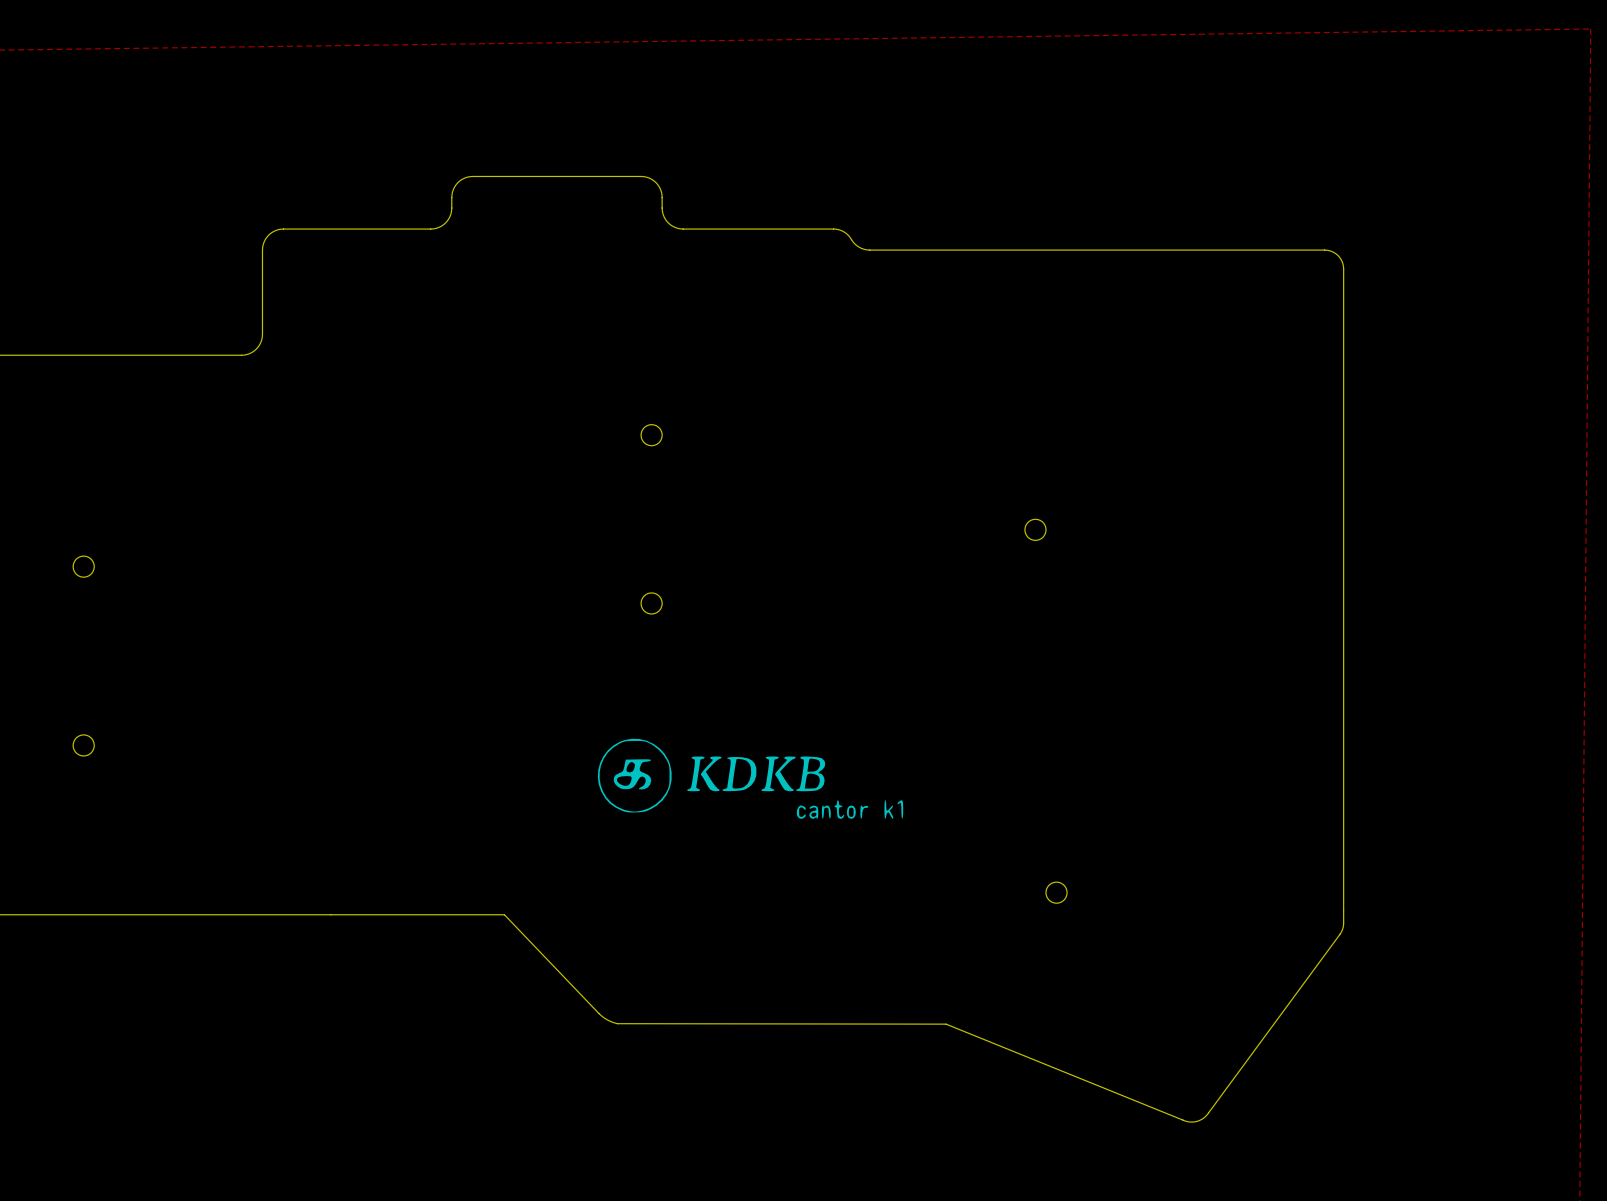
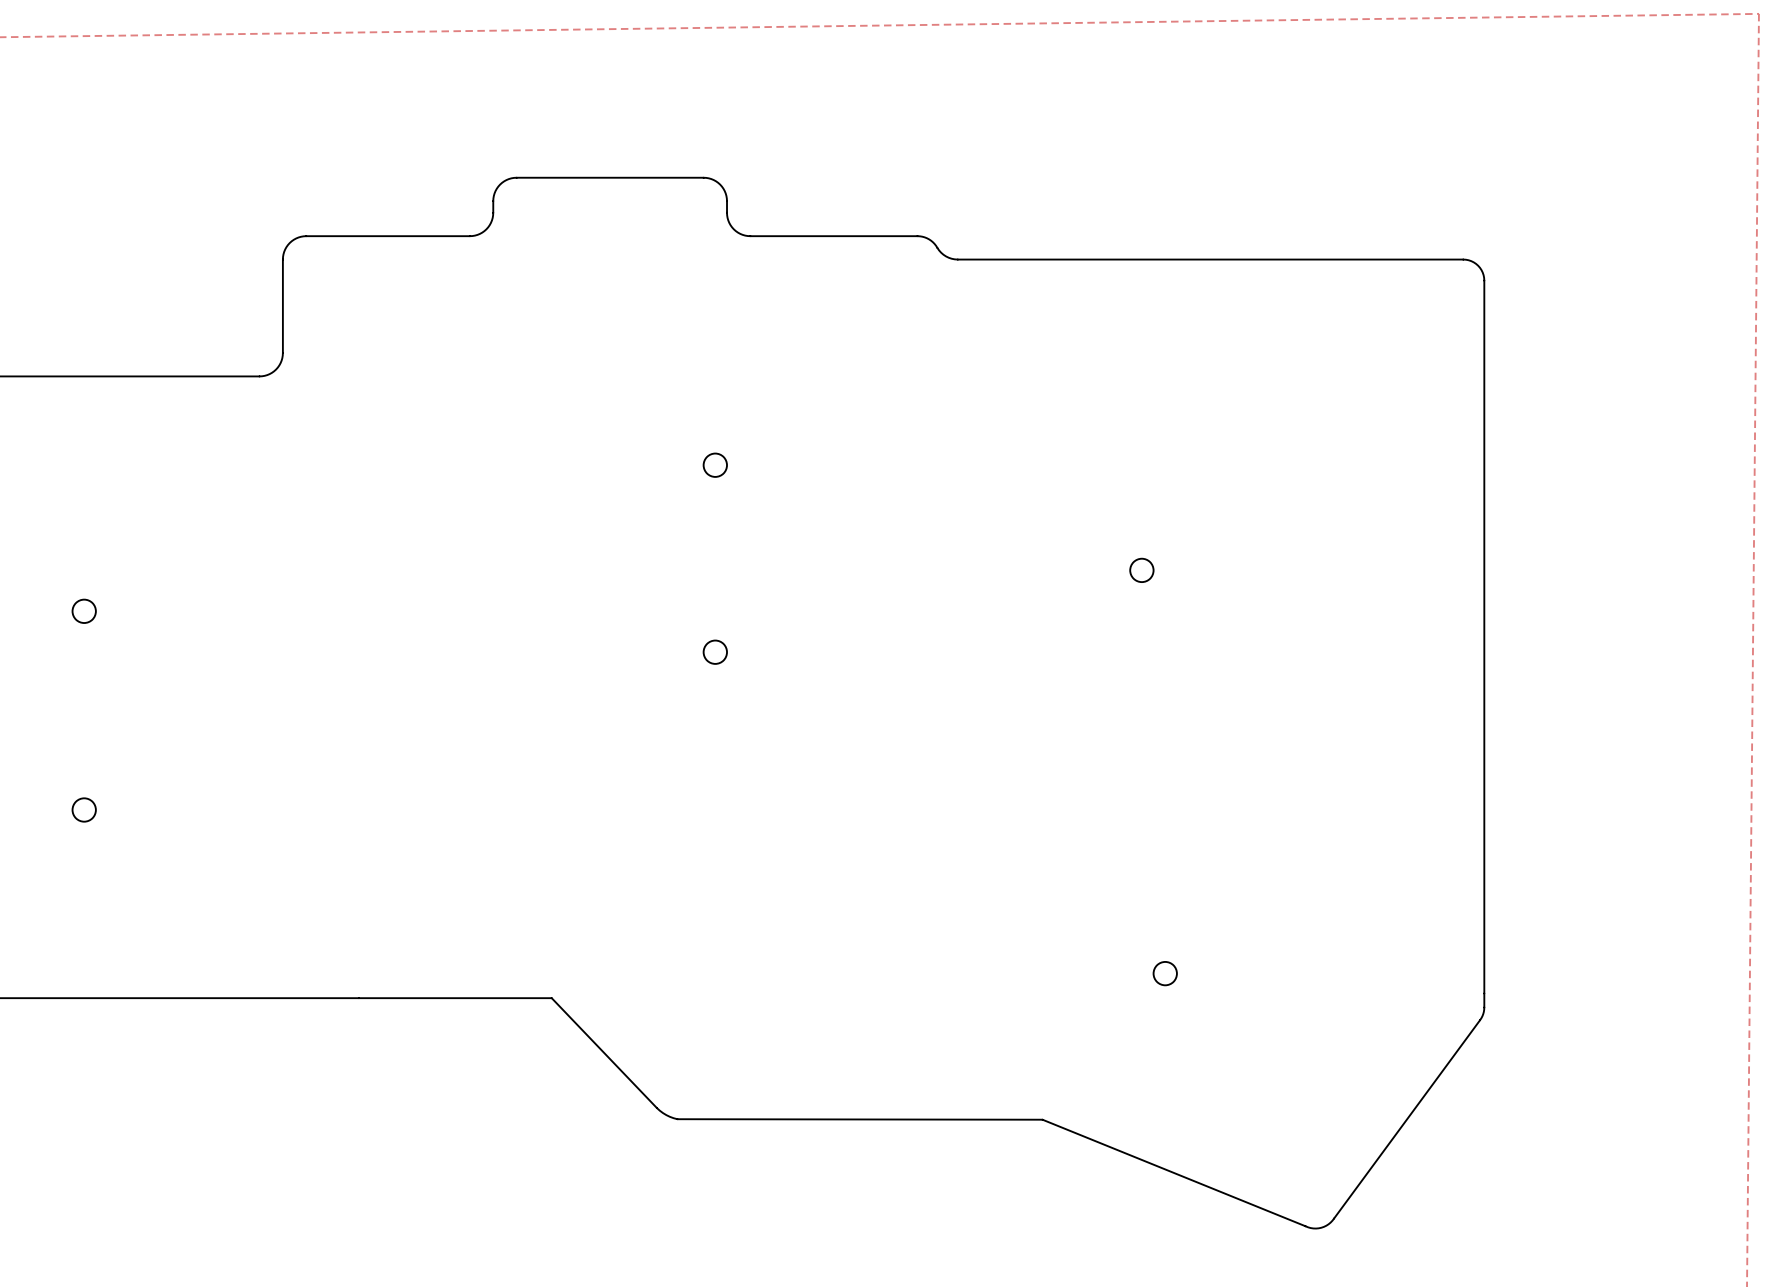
drawing: [597, 738, 904, 819] -> none

